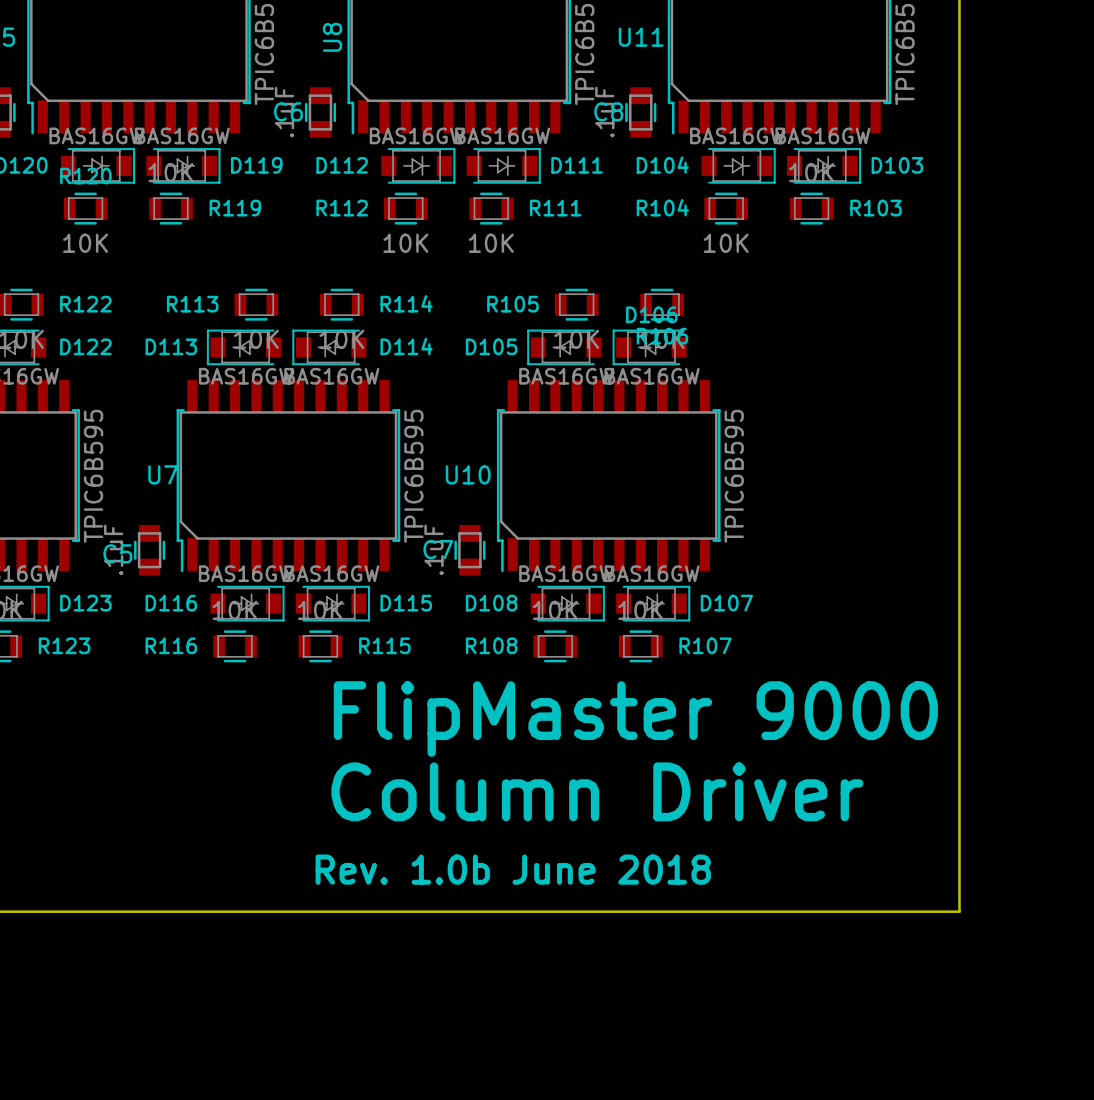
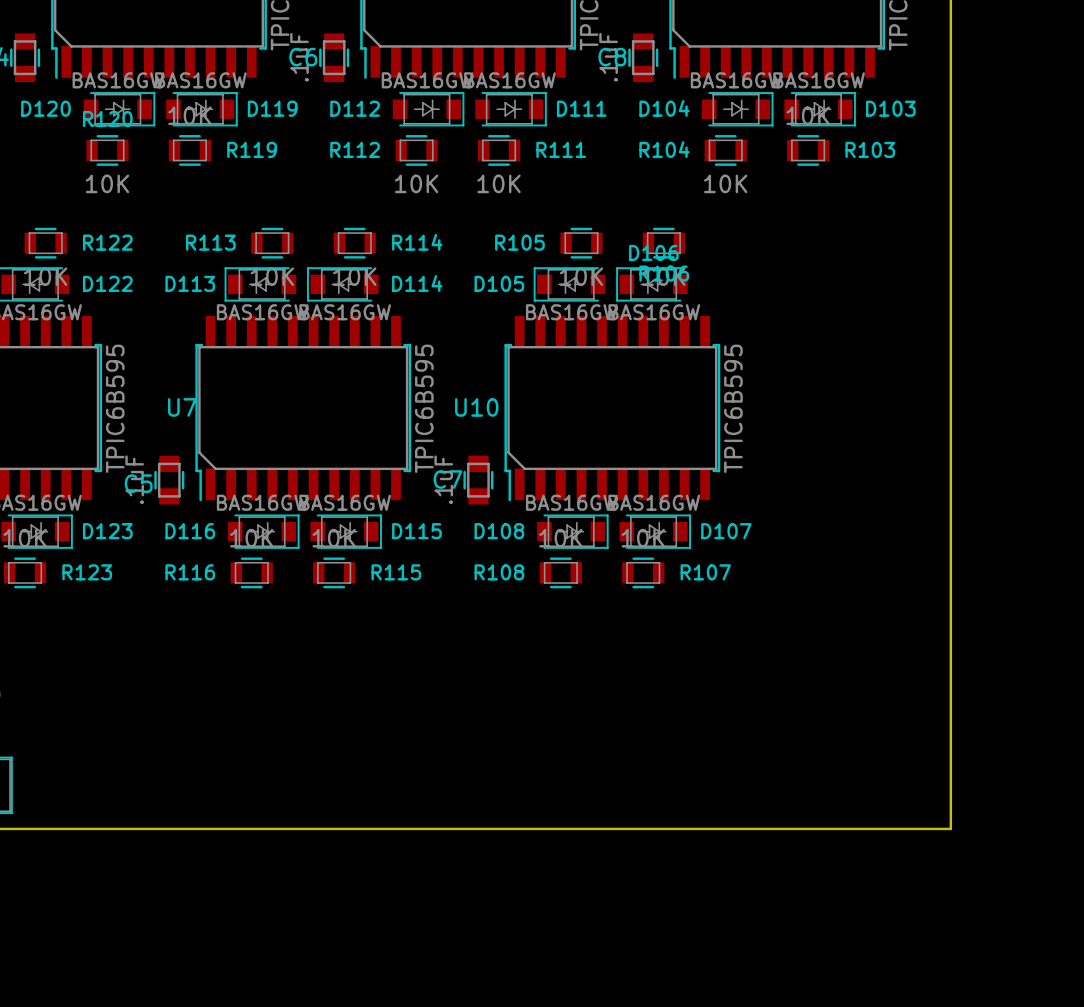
text: FlipMaster 9000 (635, 719) -> none
text: Column Driver (597, 791) -> none
text: Rev. 1.0b June 2018 (513, 869) -> none

